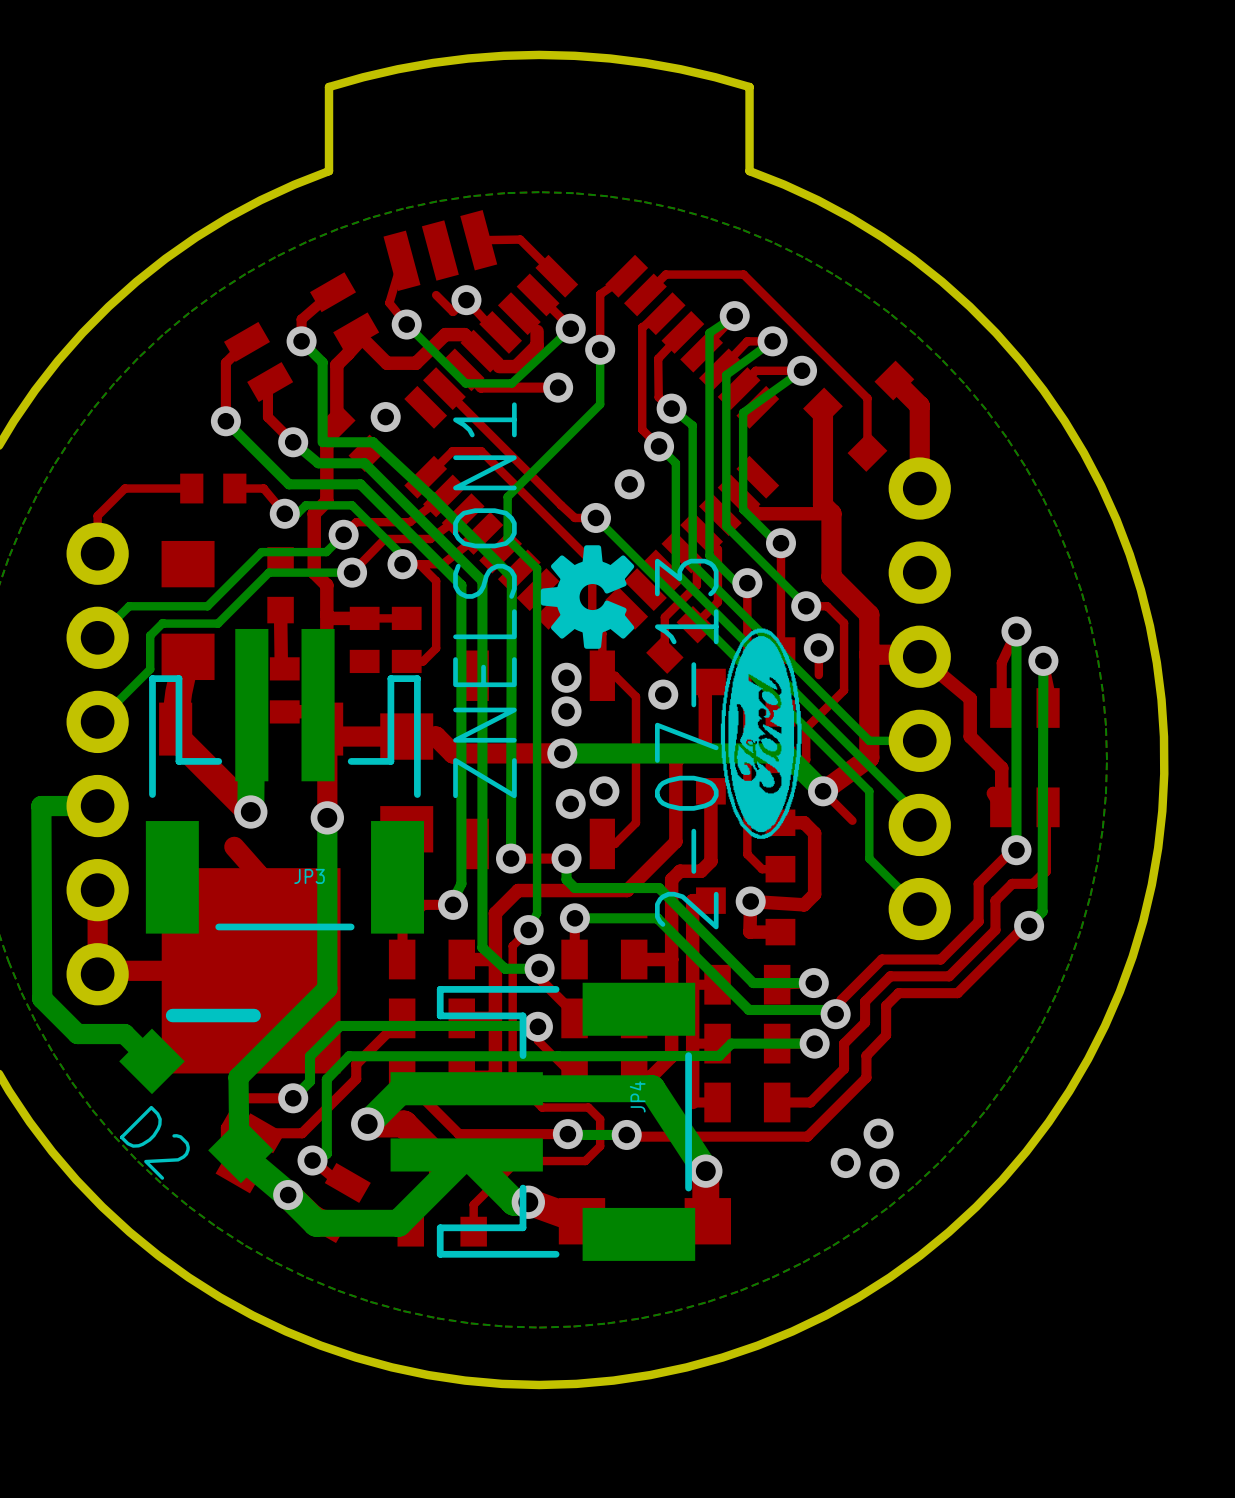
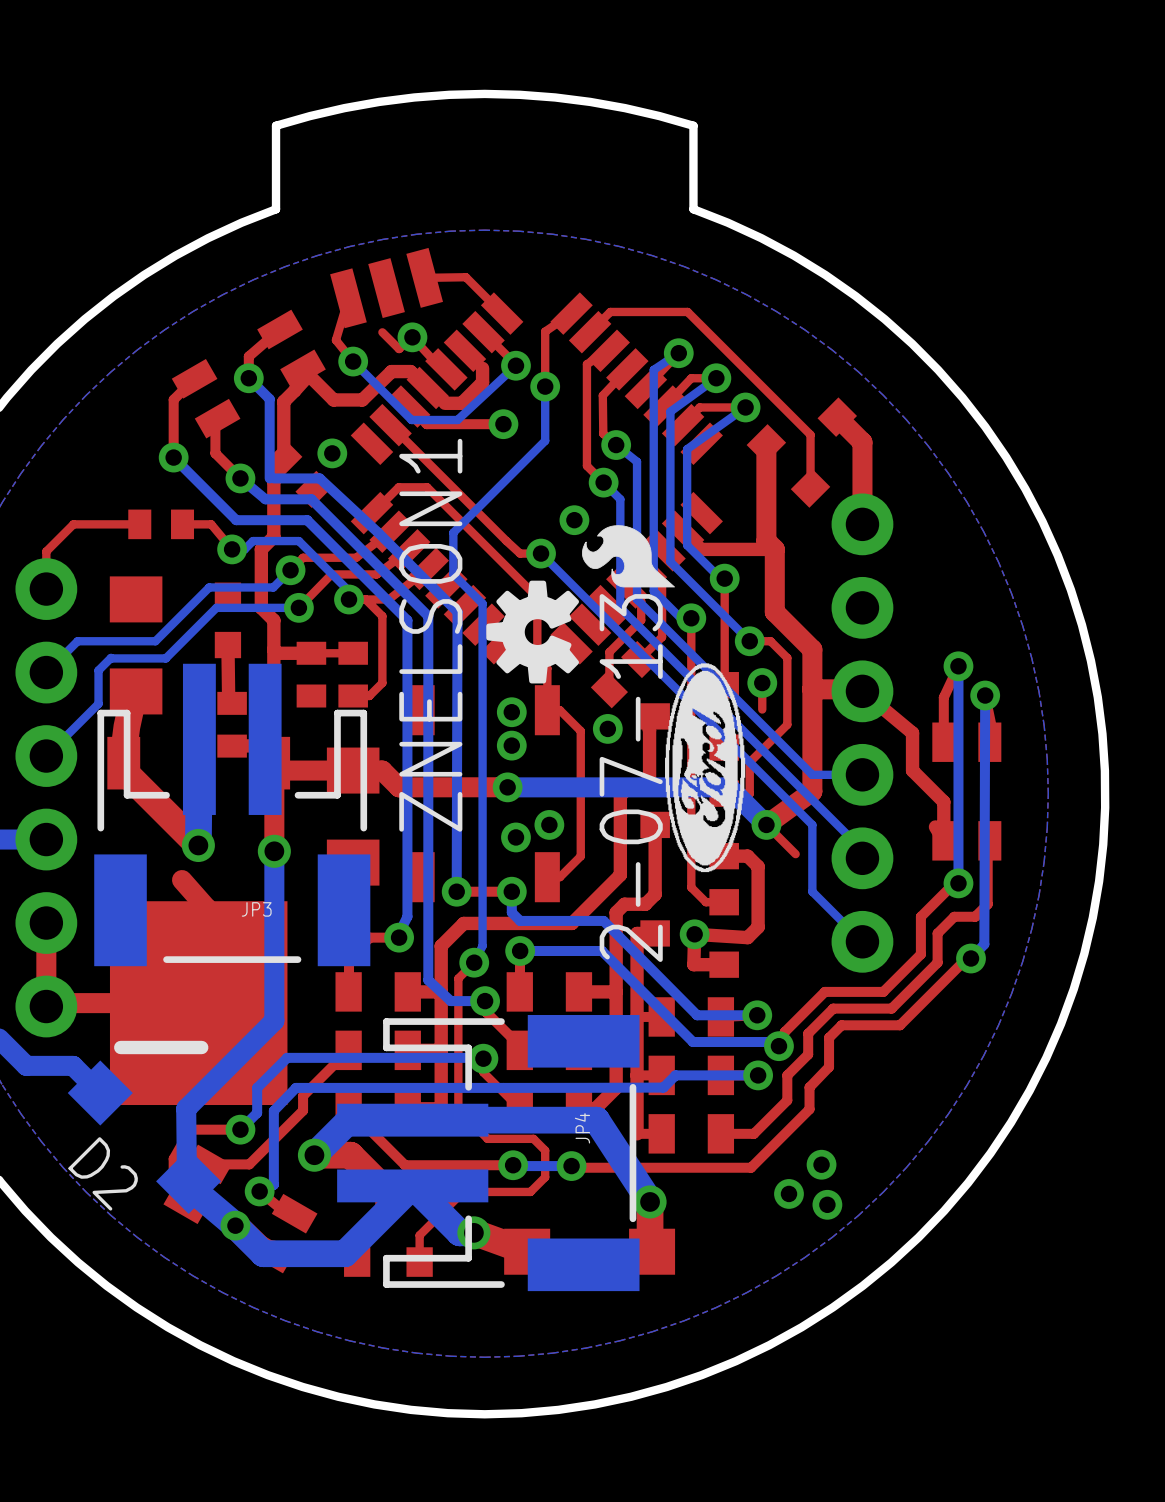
drawing: none -> [582, 525, 675, 588]

